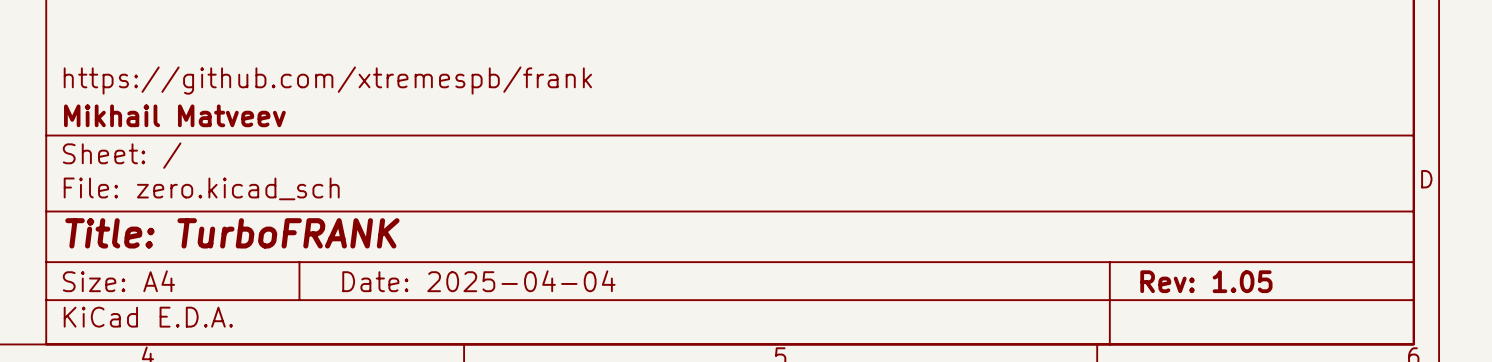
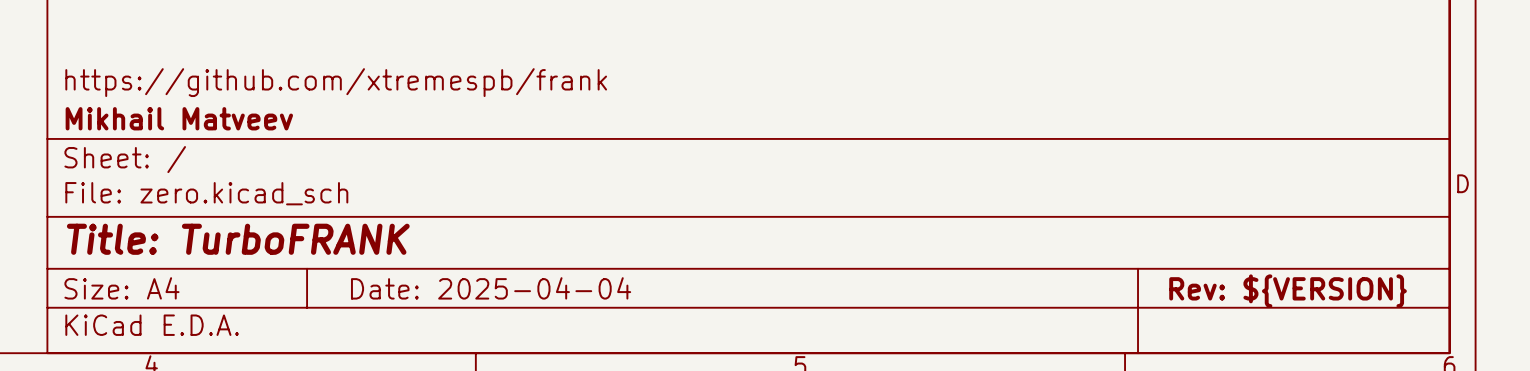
title block: Rev: 1.05 (1206, 281) -> Rev: ${VERSION} (1288, 291)

